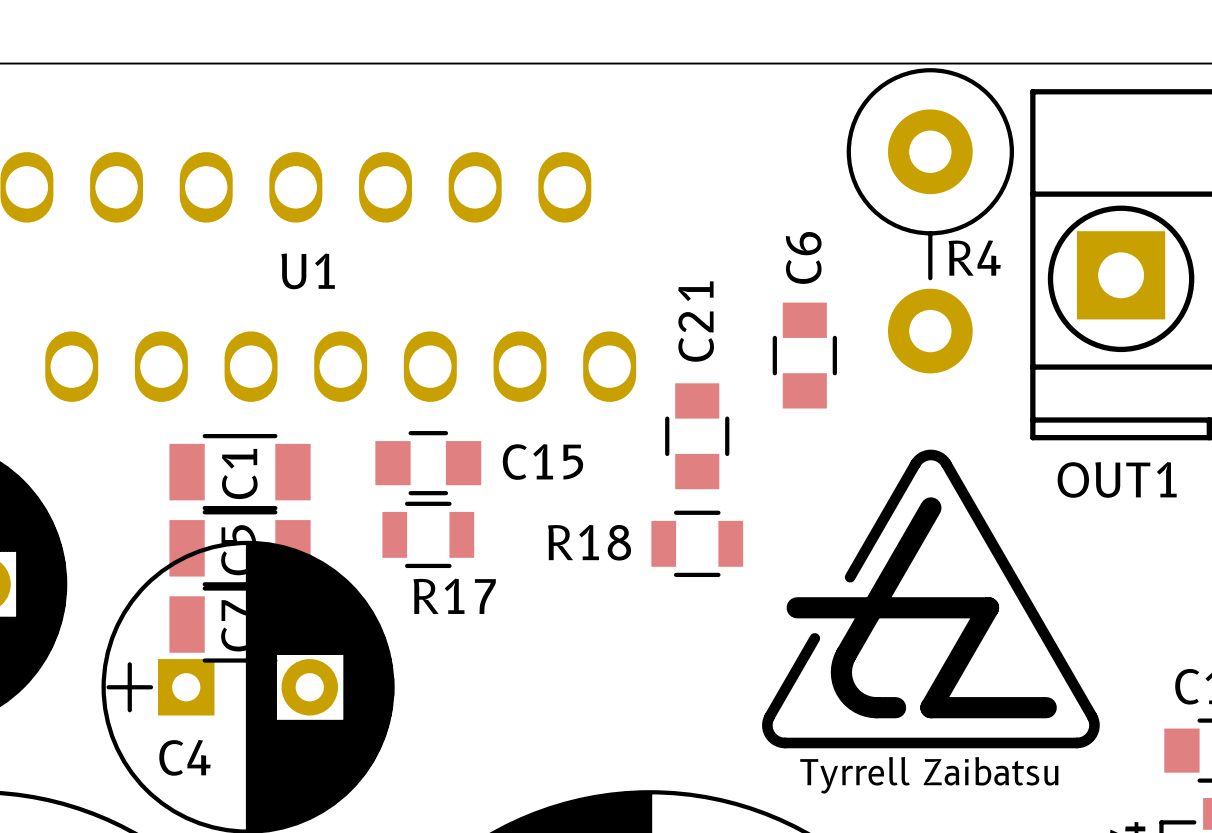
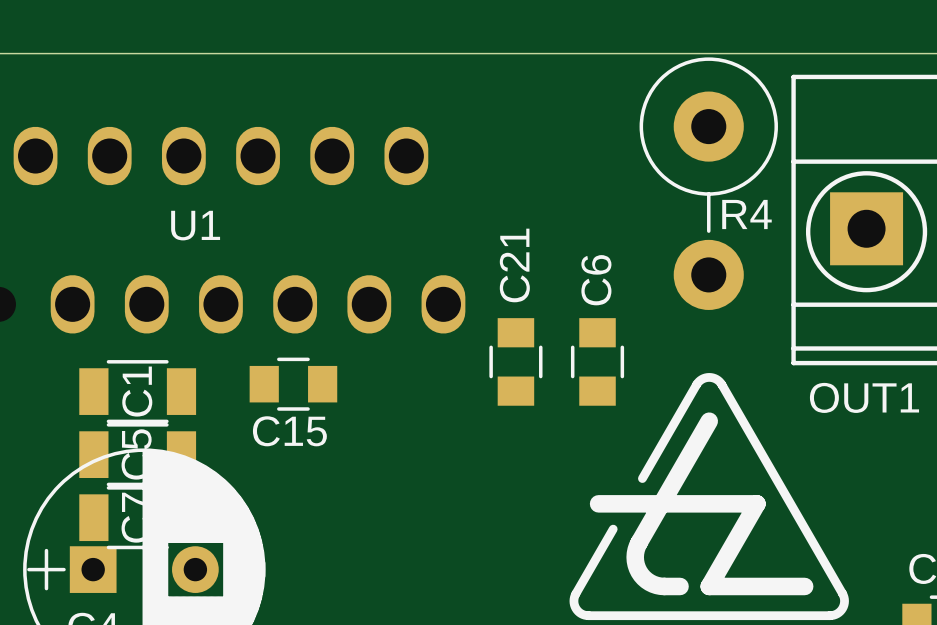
C6 position: (804, 355) -> (597, 361)
C15 name position: C15 (542, 462) -> C15 (289, 431)
R17: (428, 534) -> none
R18: (697, 543) -> none

